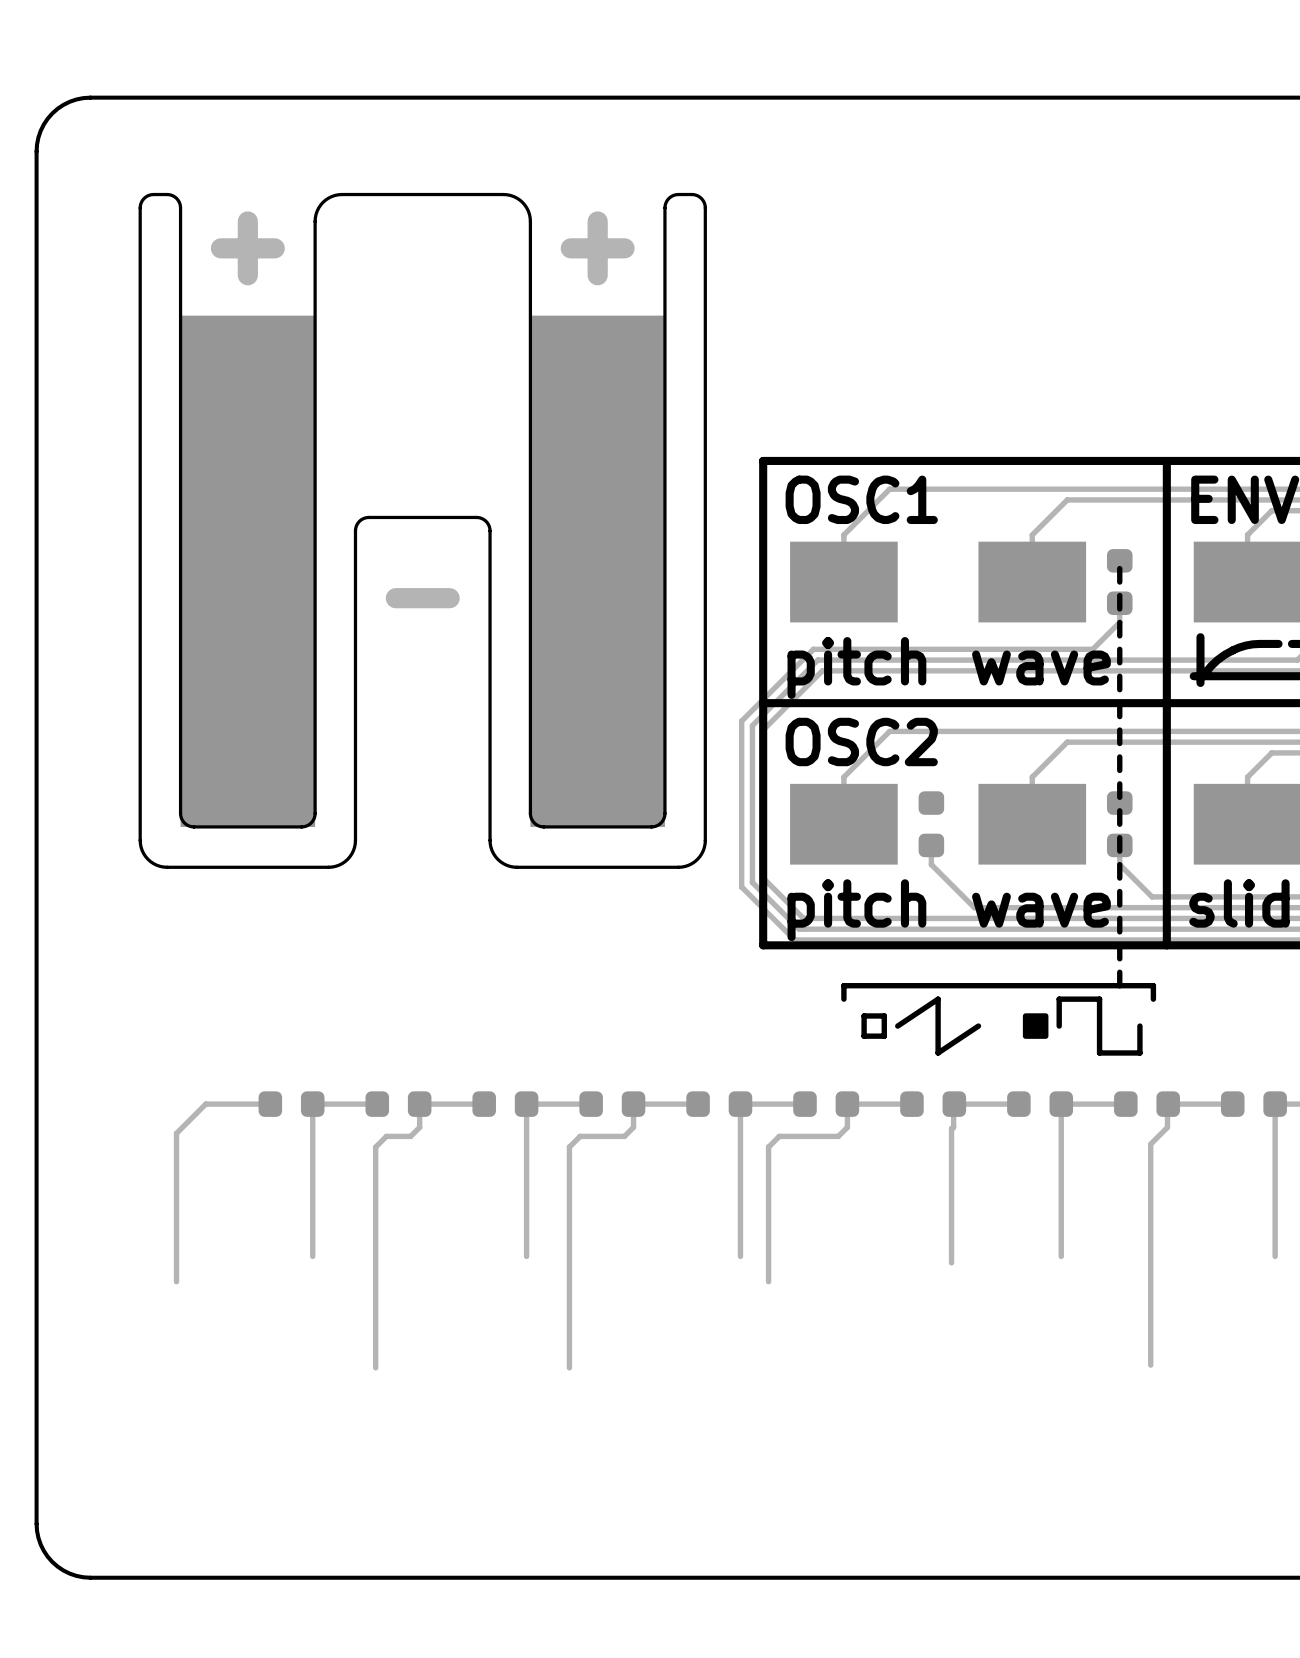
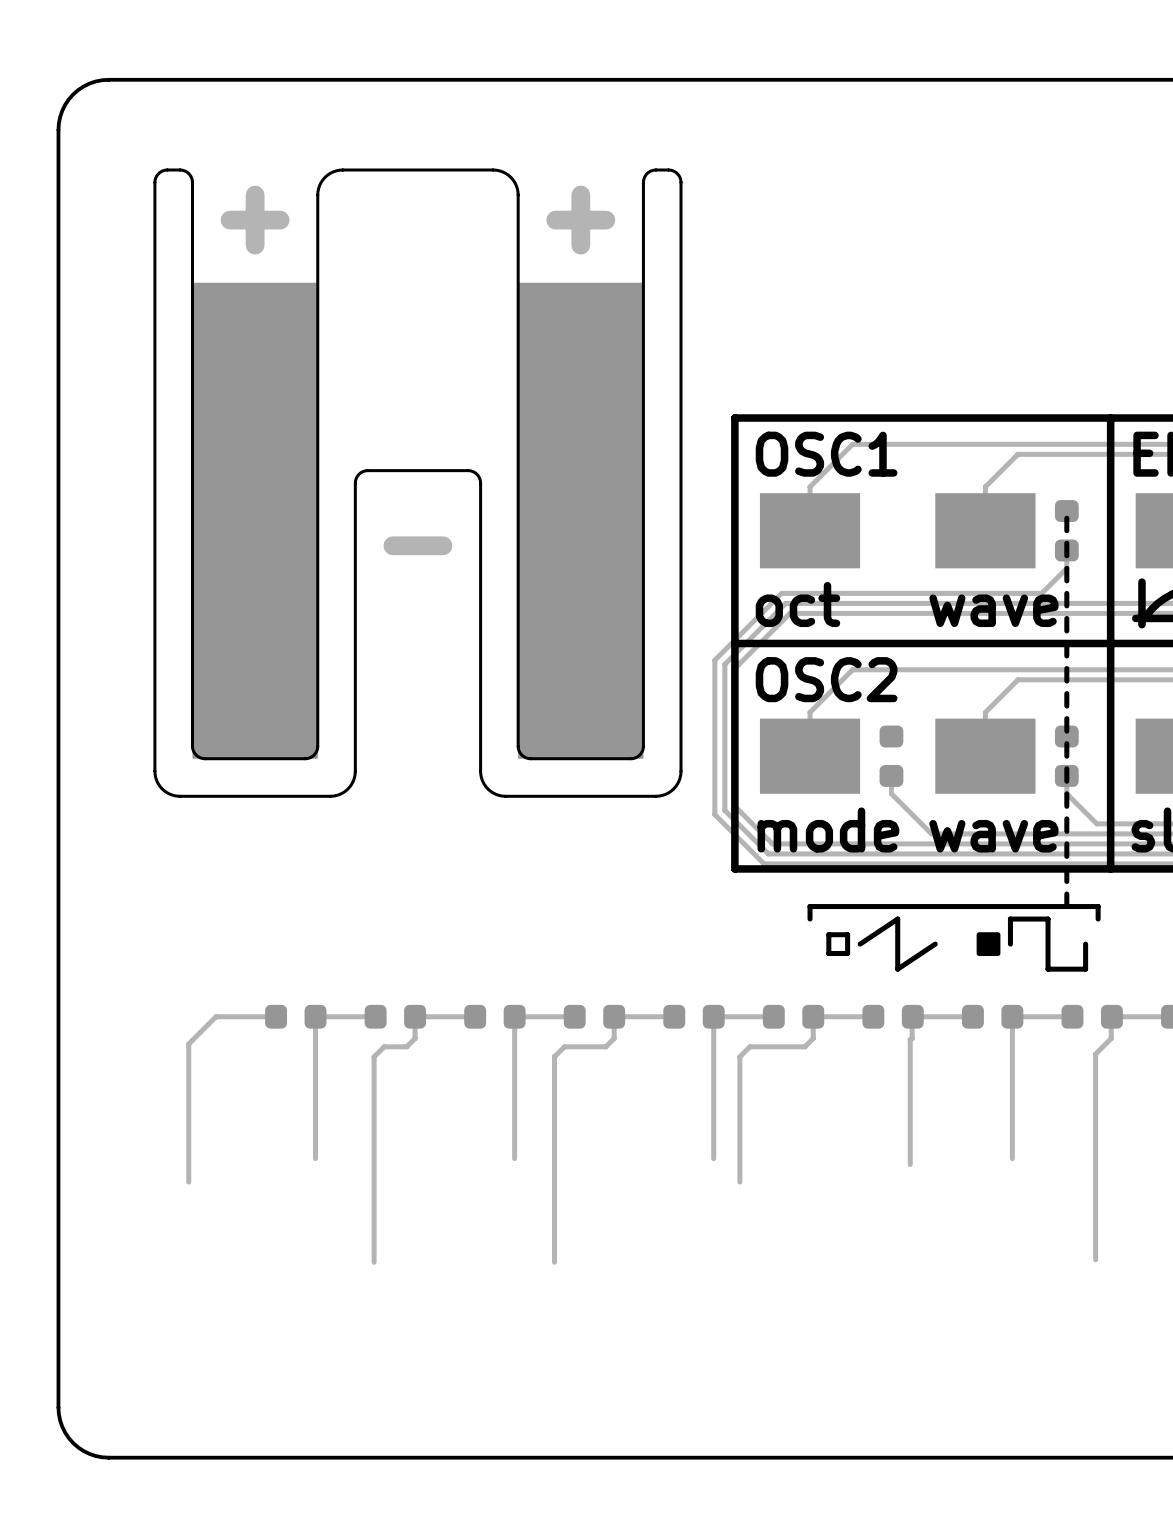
text: pitch (856, 667) -> oct (797, 604)
text: pitch (856, 910) -> mode (828, 829)

